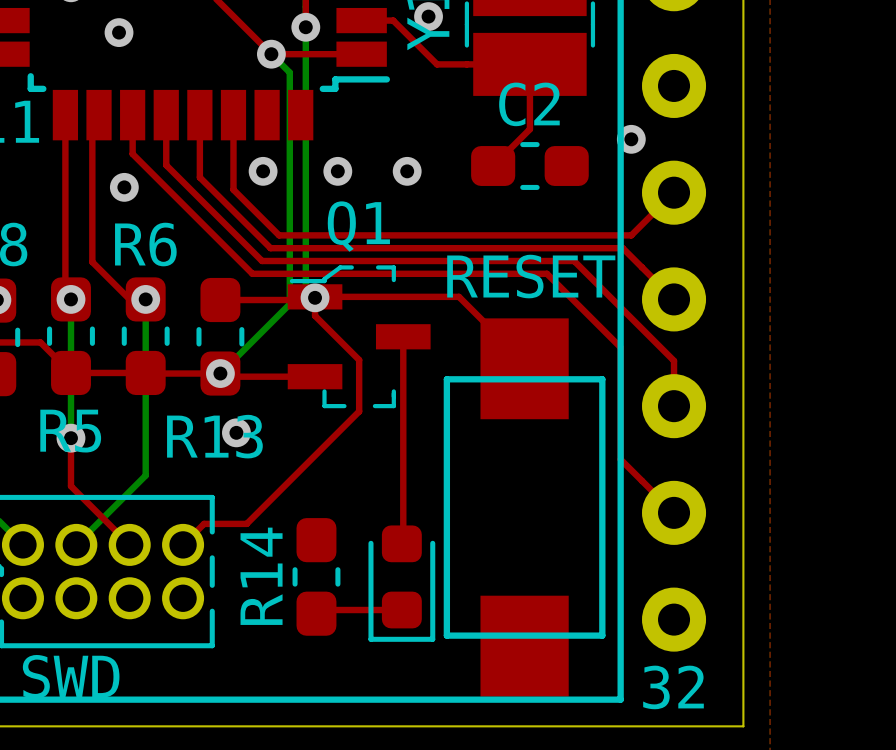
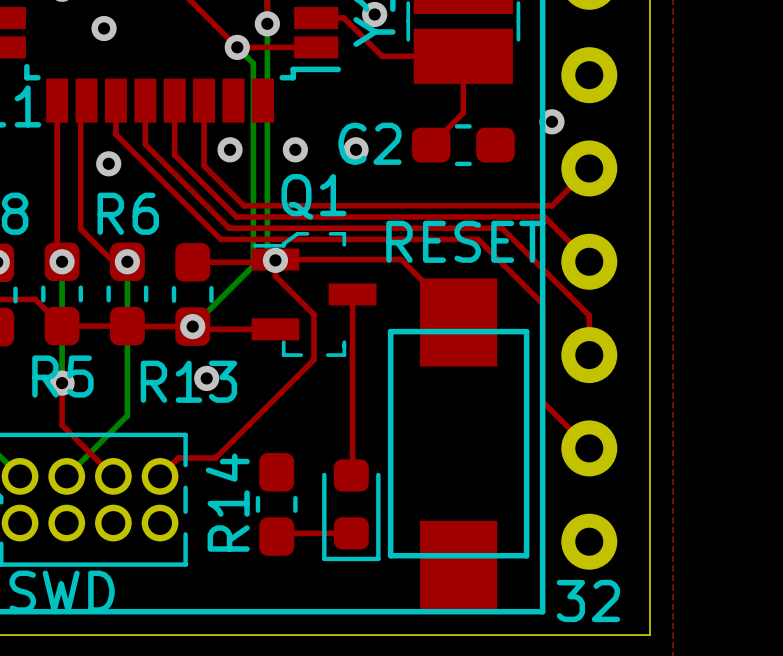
C2 name position: C2 (529, 104) -> C2 (370, 143)

